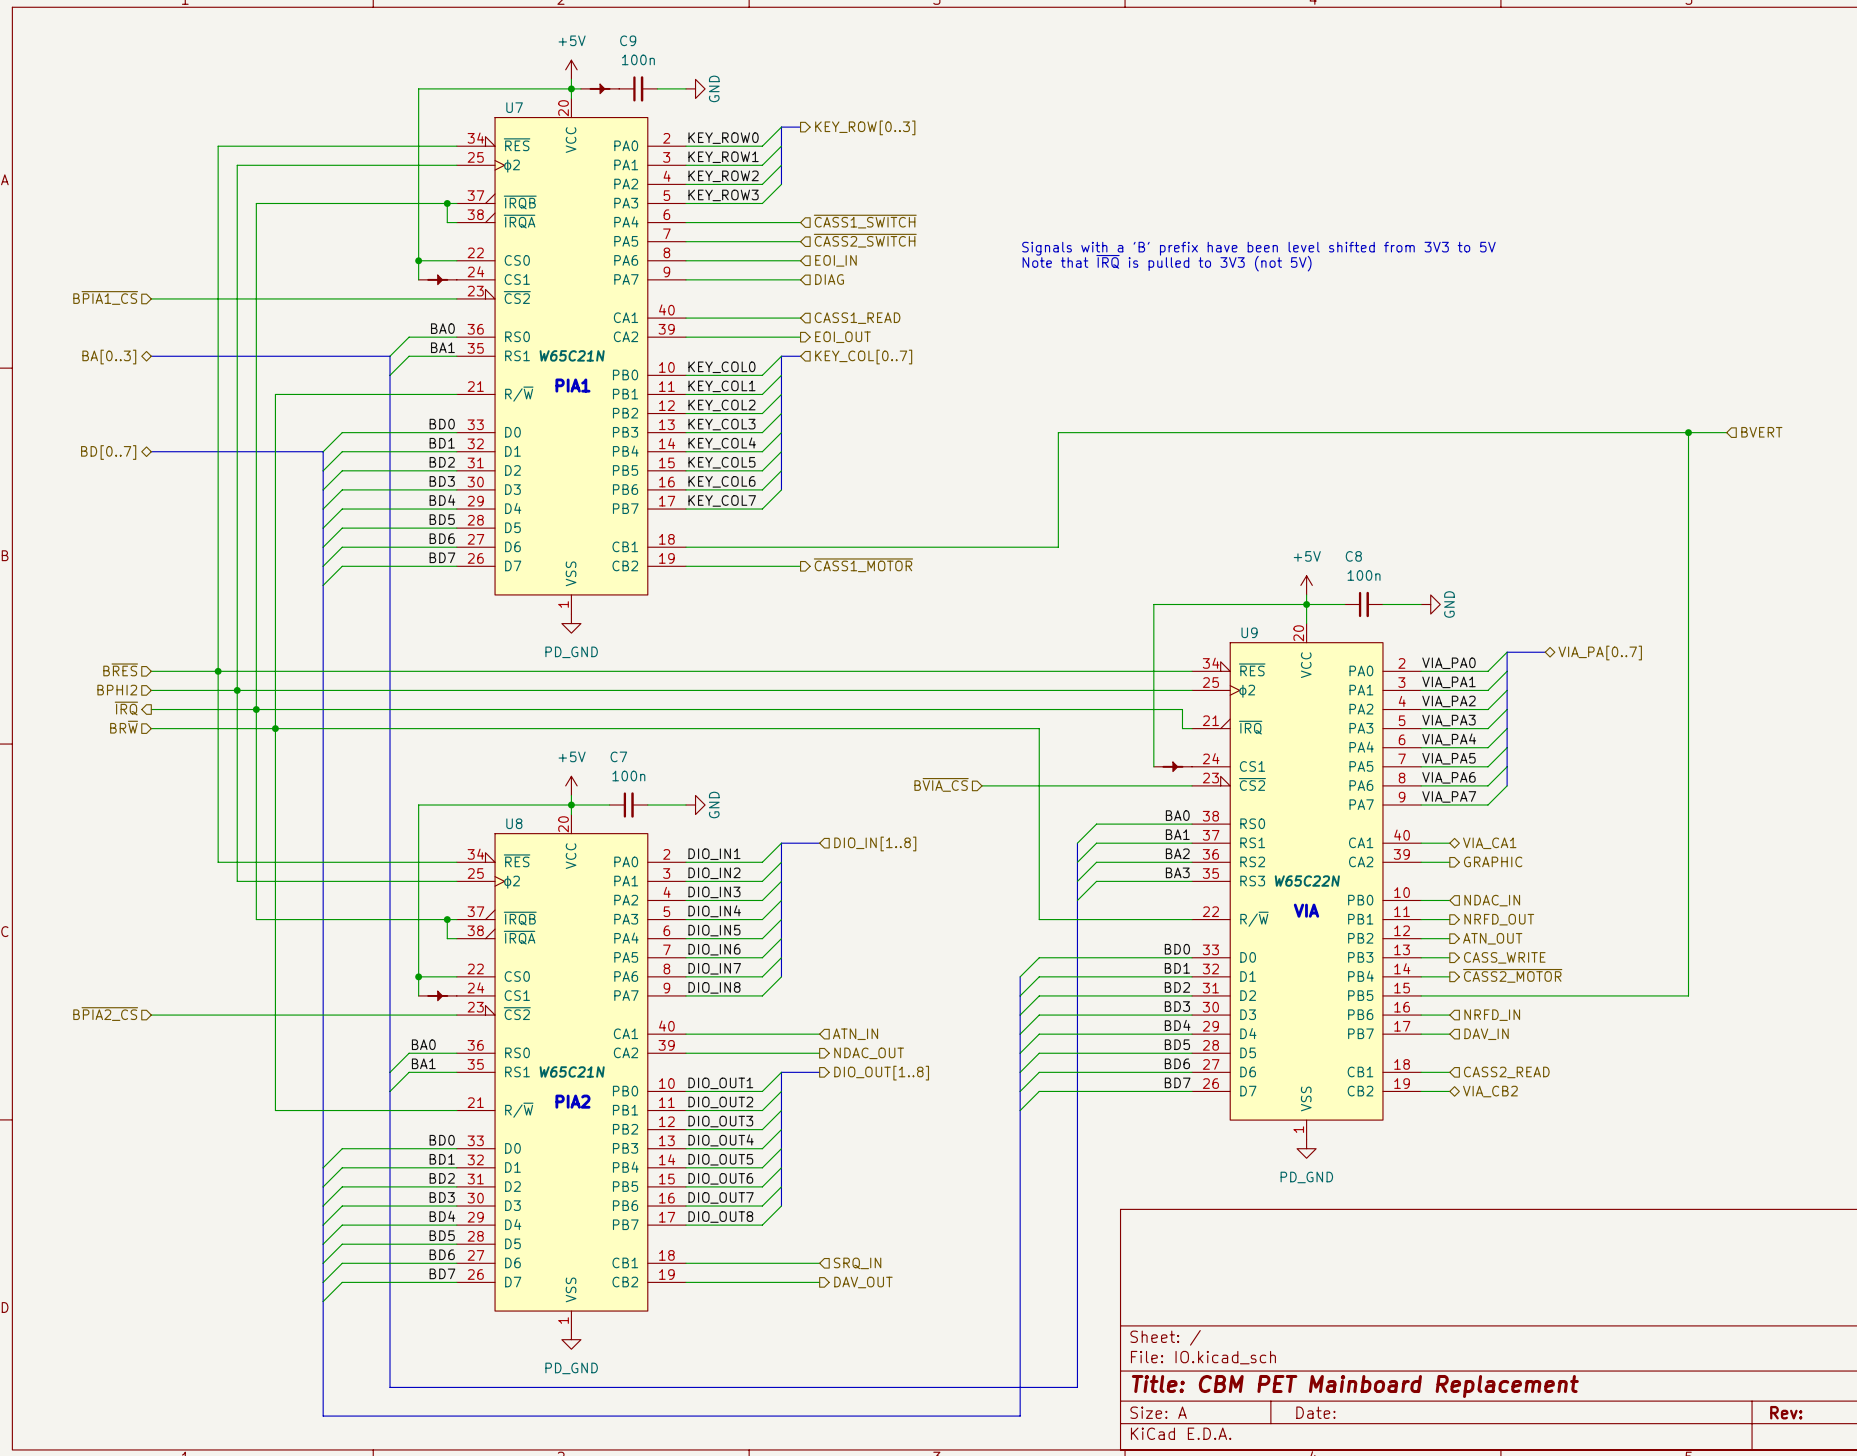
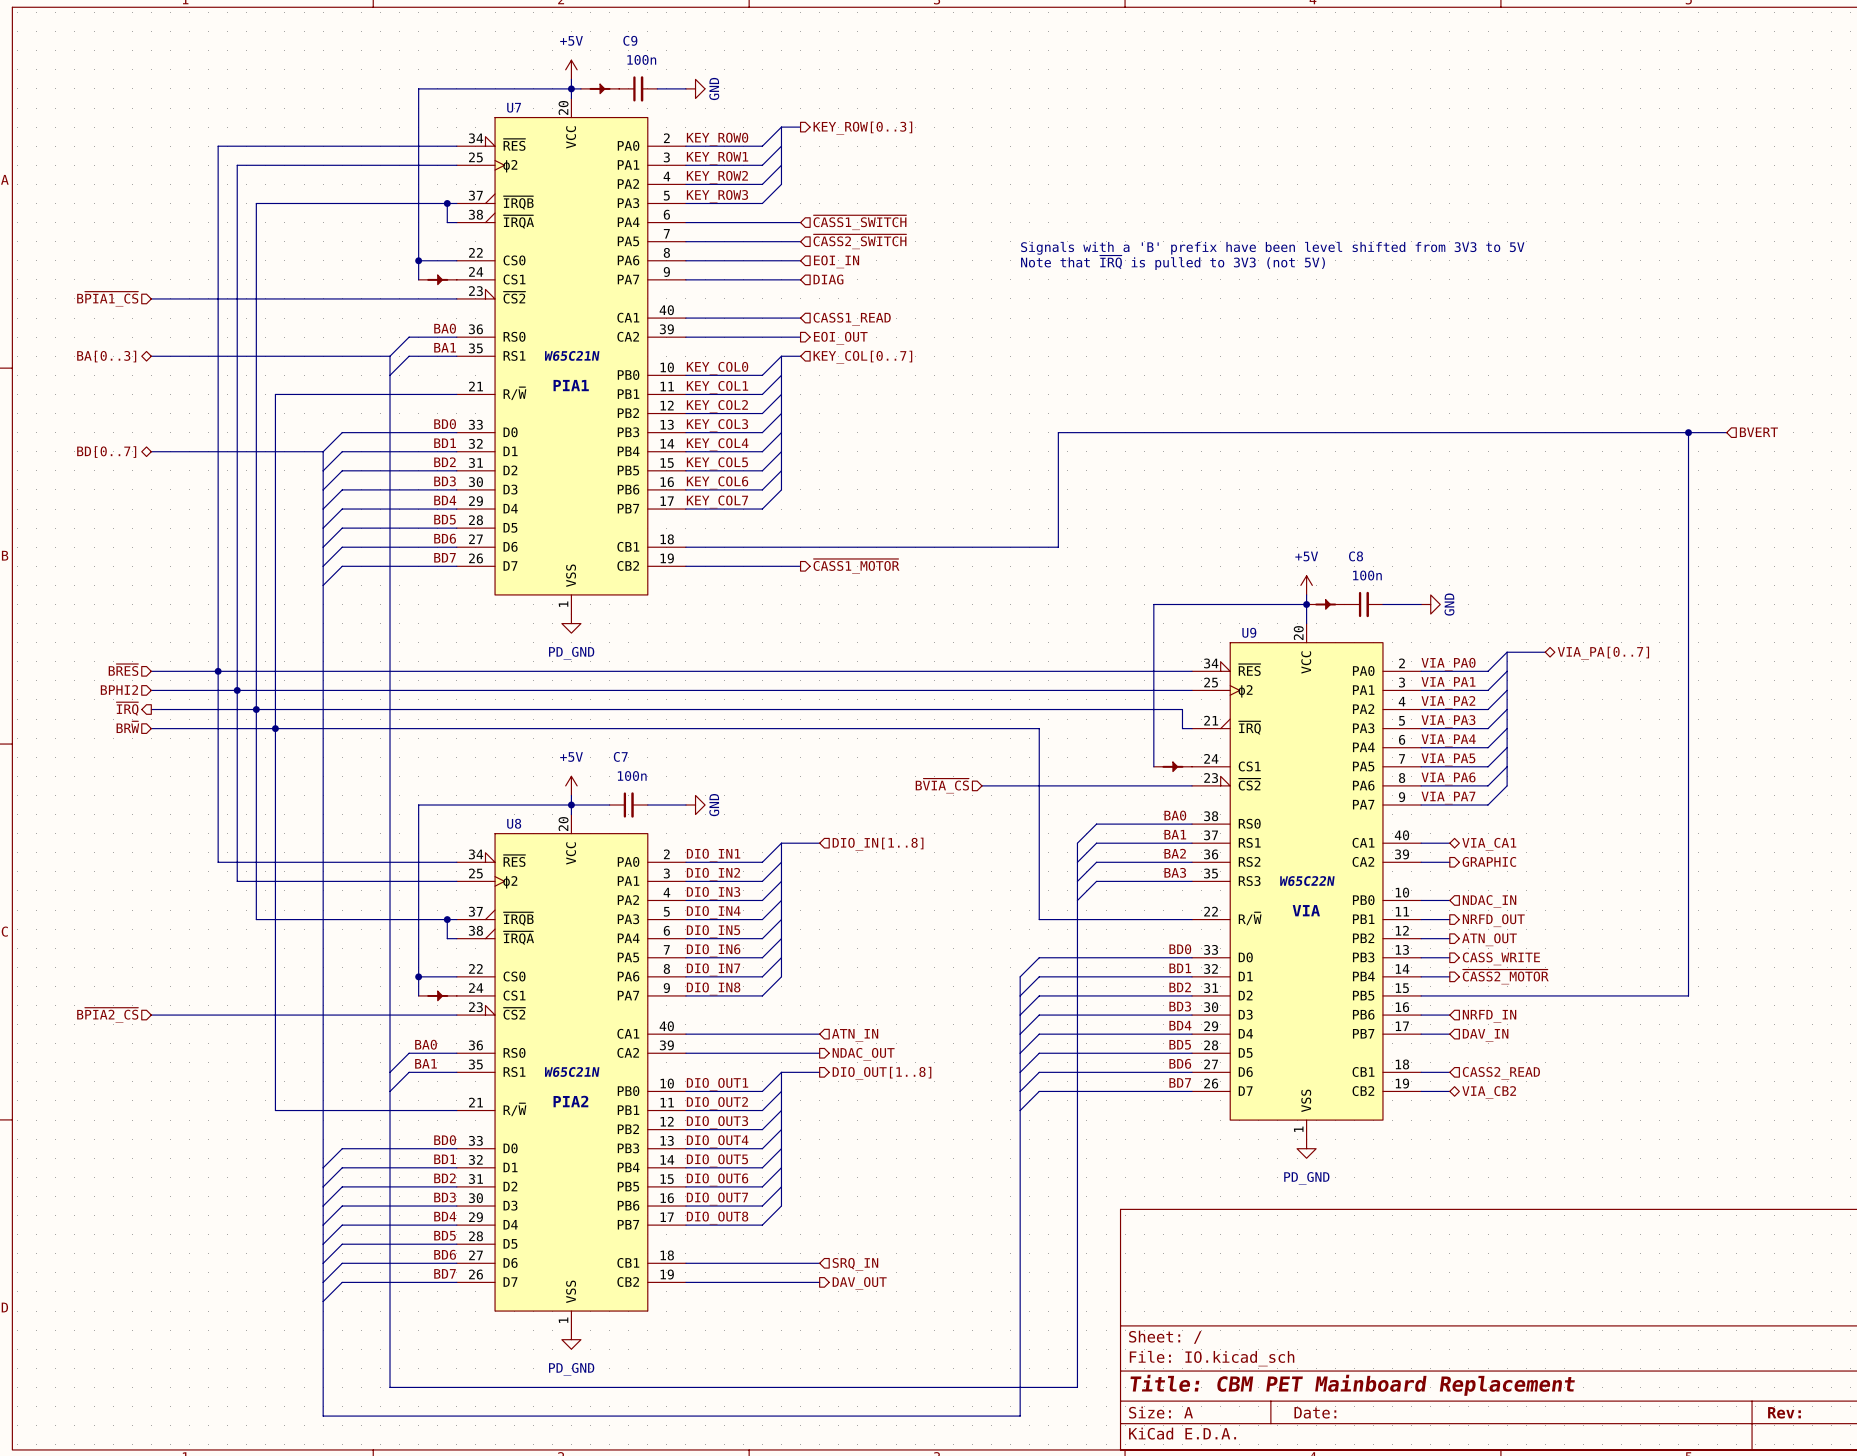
part: none -> (1325, 604)

